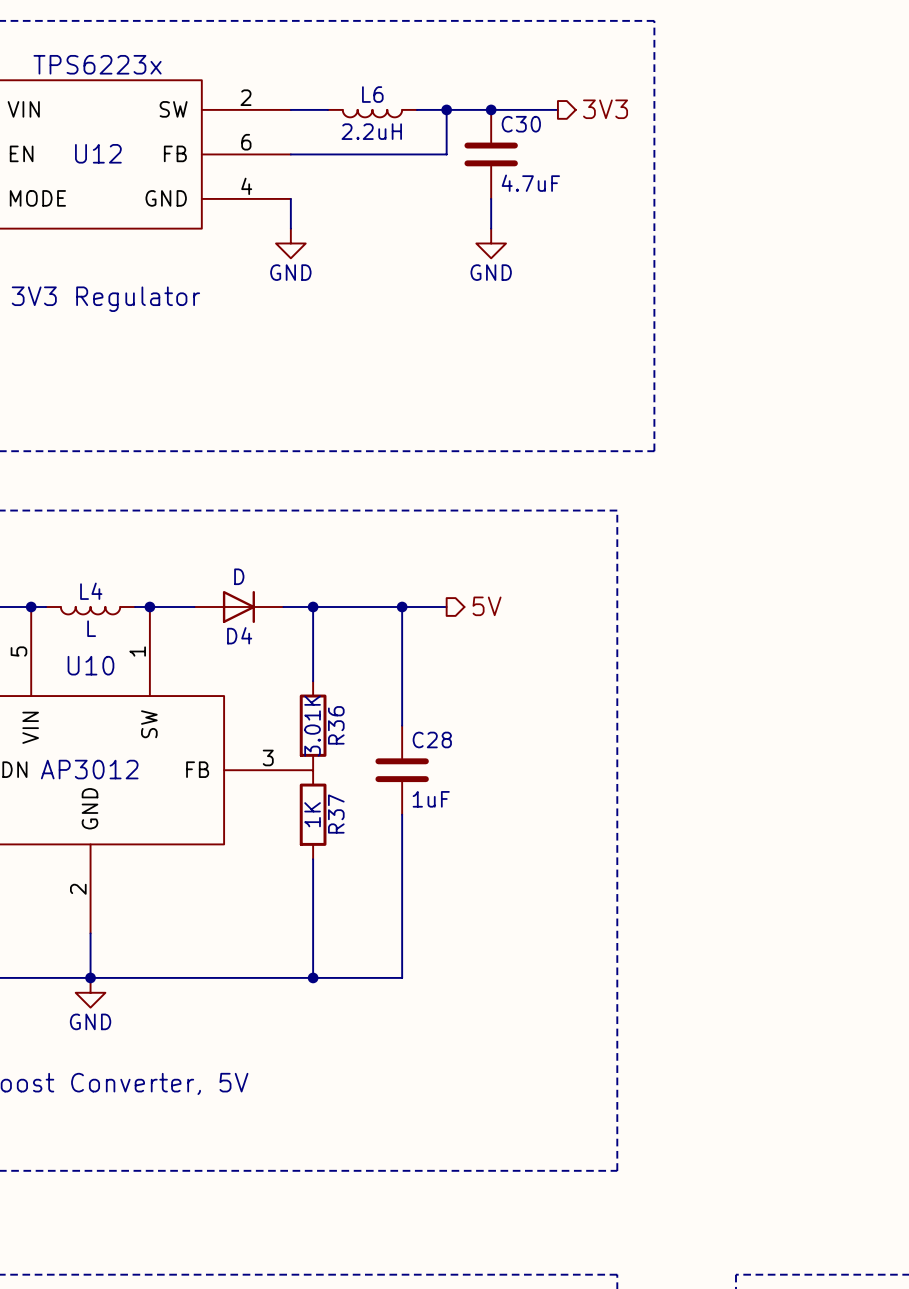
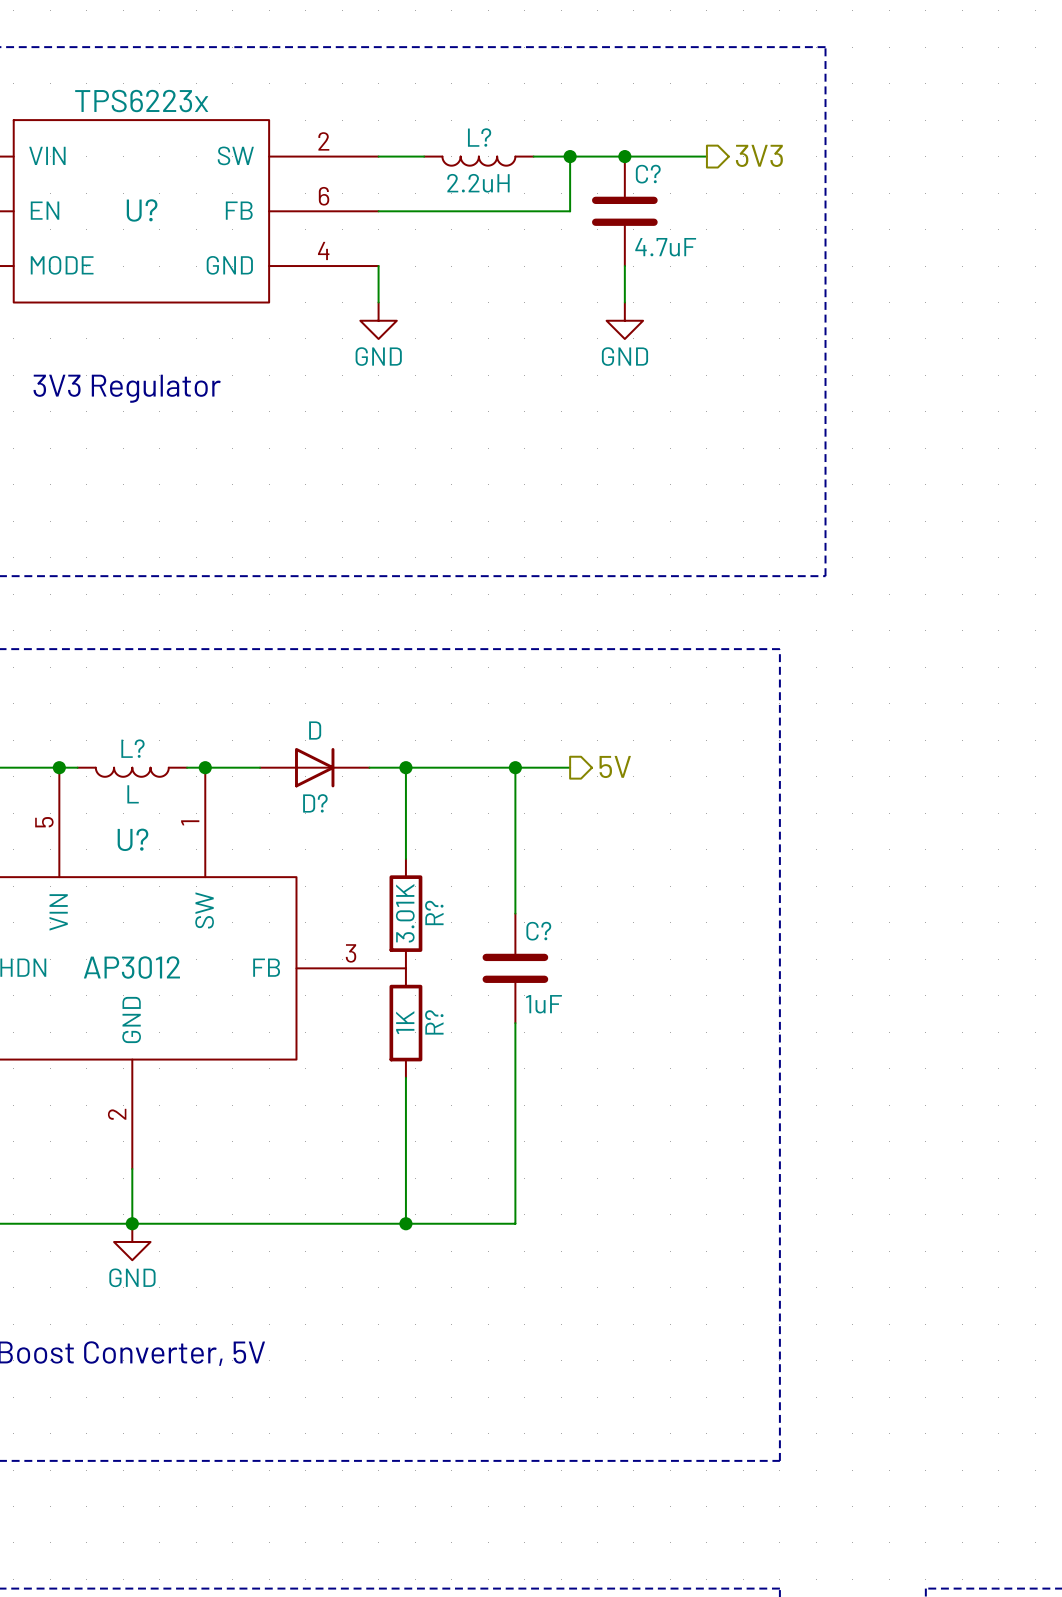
L6 name: L6 (372, 94) -> L? (479, 137)
C30 name: C30 (521, 124) -> C? (648, 174)
U12 name: U12 (98, 153) -> U? (142, 210)
L4 name: L4 (91, 591) -> L? (132, 748)
D4 name: D4 (239, 635) -> D? (315, 803)
U10 name: U10 (90, 665) -> U? (132, 839)
R36 name: R36 (336, 725) -> R? (434, 912)
C28 name: C28 (432, 739) -> C? (538, 931)
R37 name: R37 (336, 814) -> R? (434, 1022)

